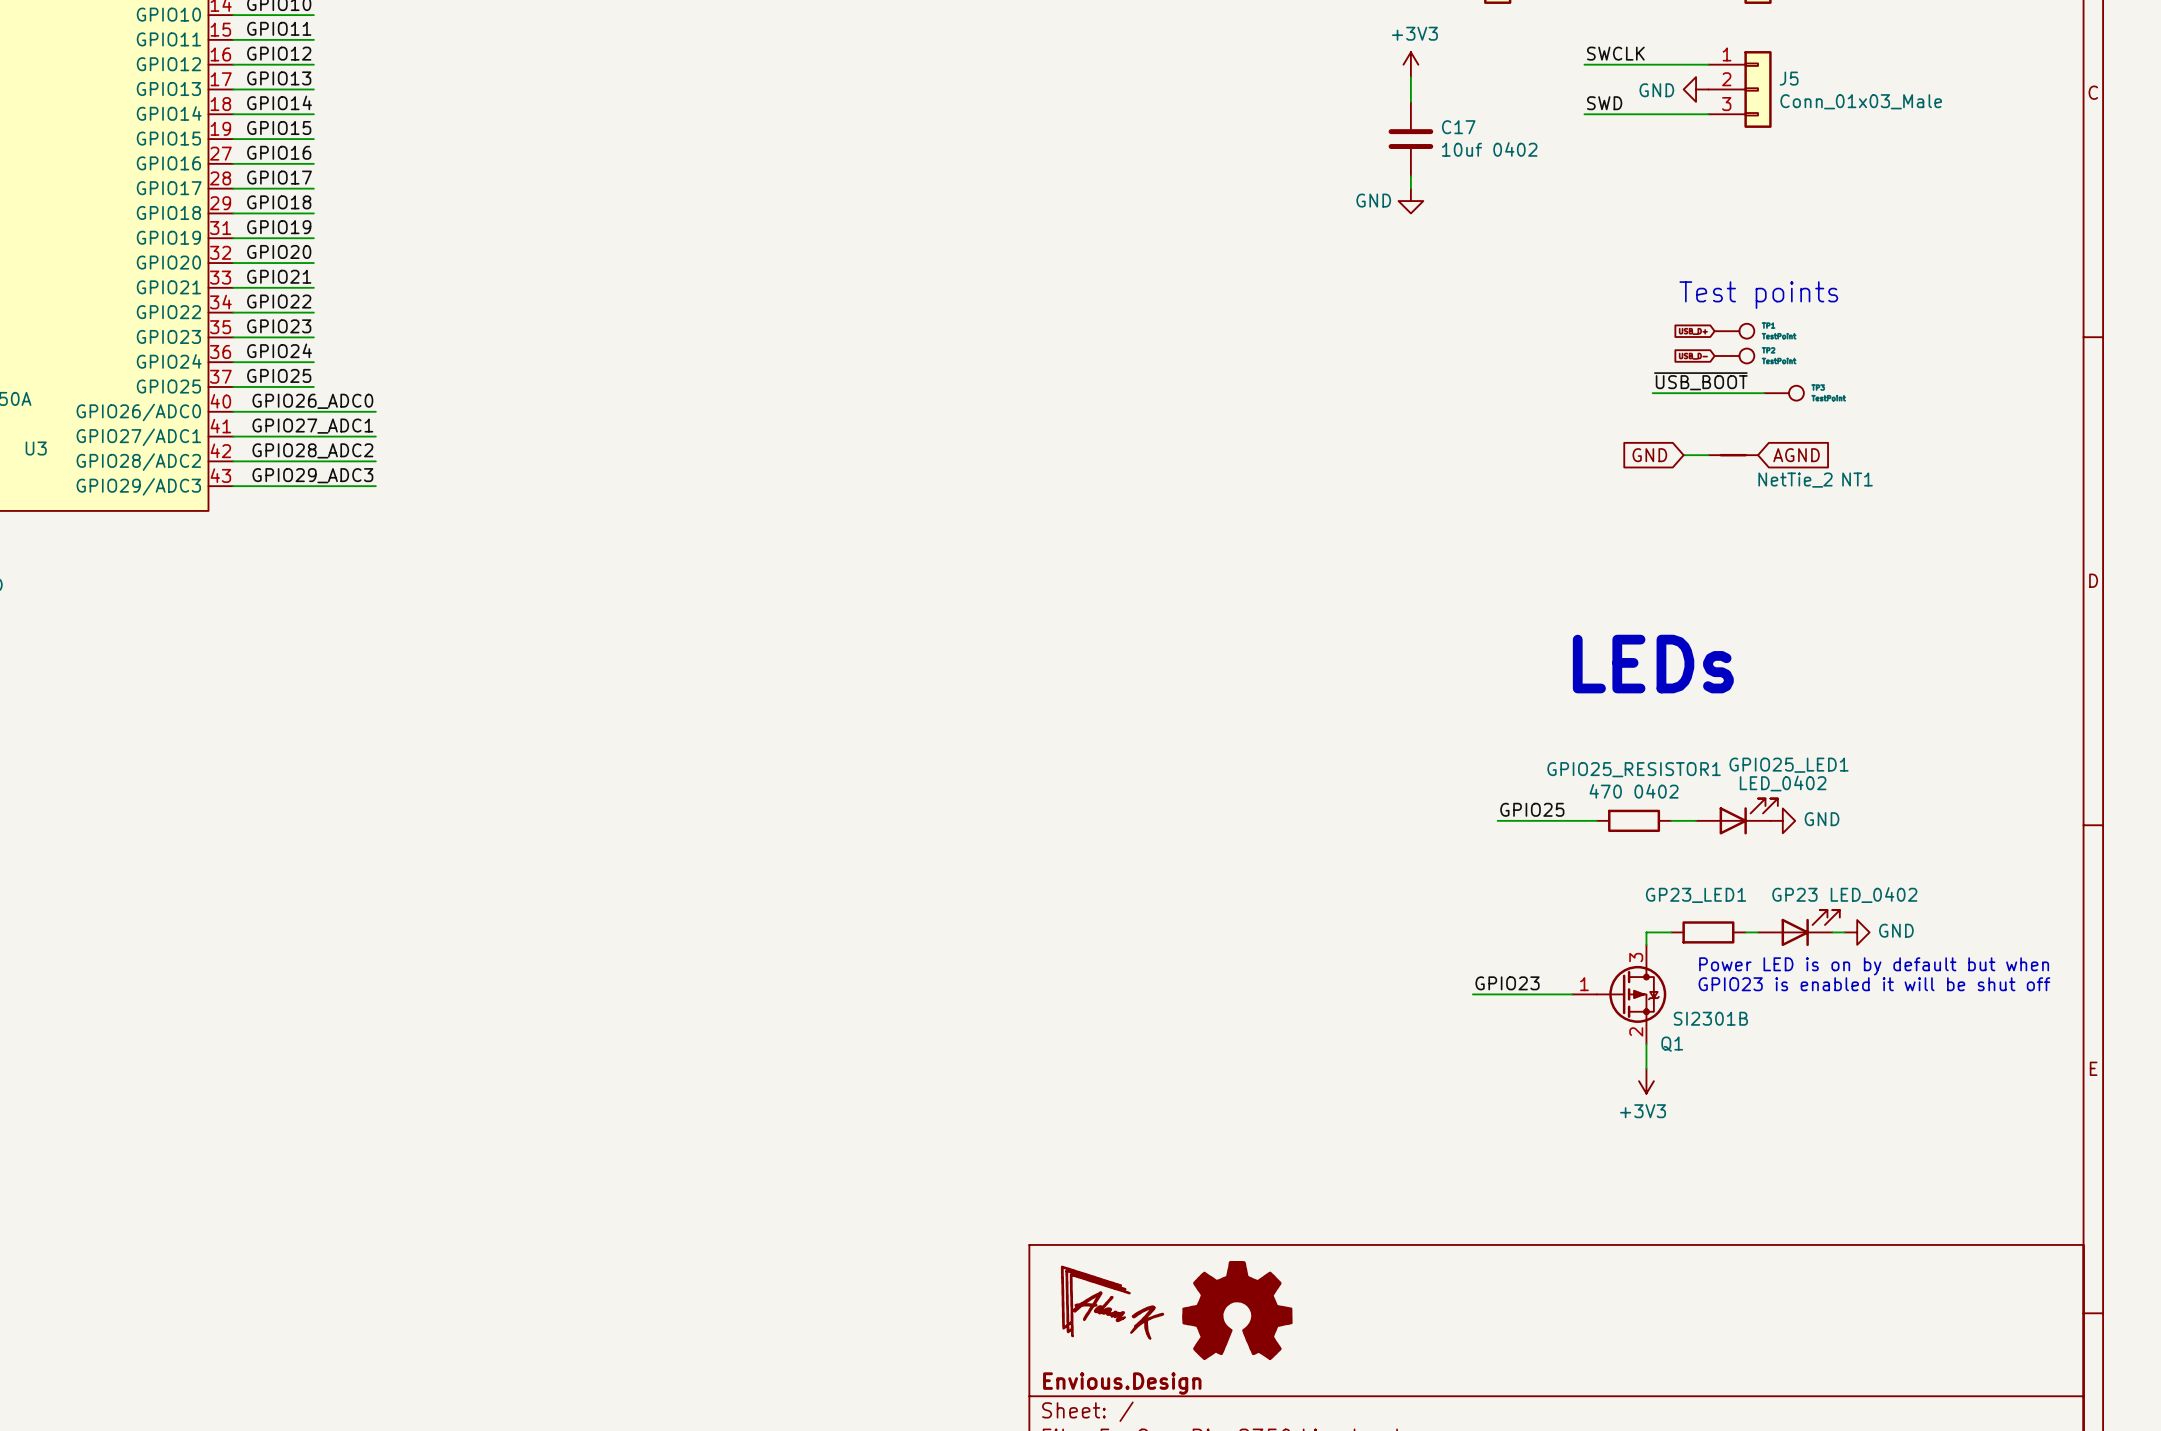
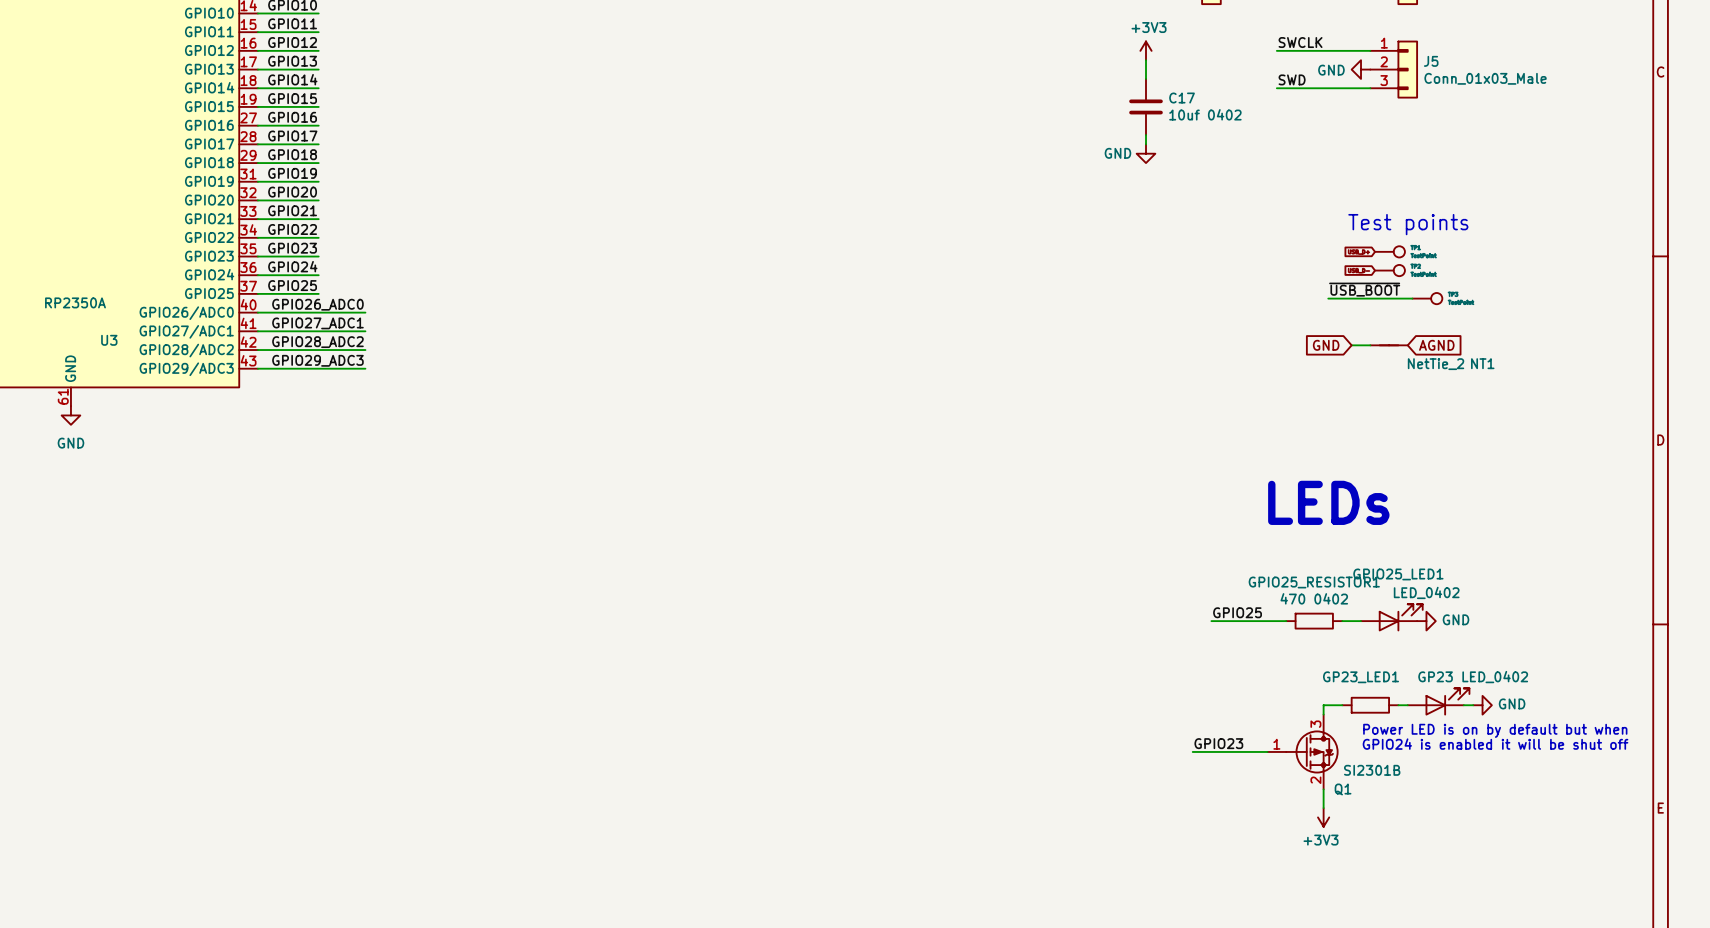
GPIO25_LED1 name position: GPIO25_LED1 (1789, 765) -> GPIO25_LED1 (1398, 574)
text: GPIO23 is enabled it will be shut off (1874, 984) -> GPIO24 is enabled it will be shut off (1495, 744)

